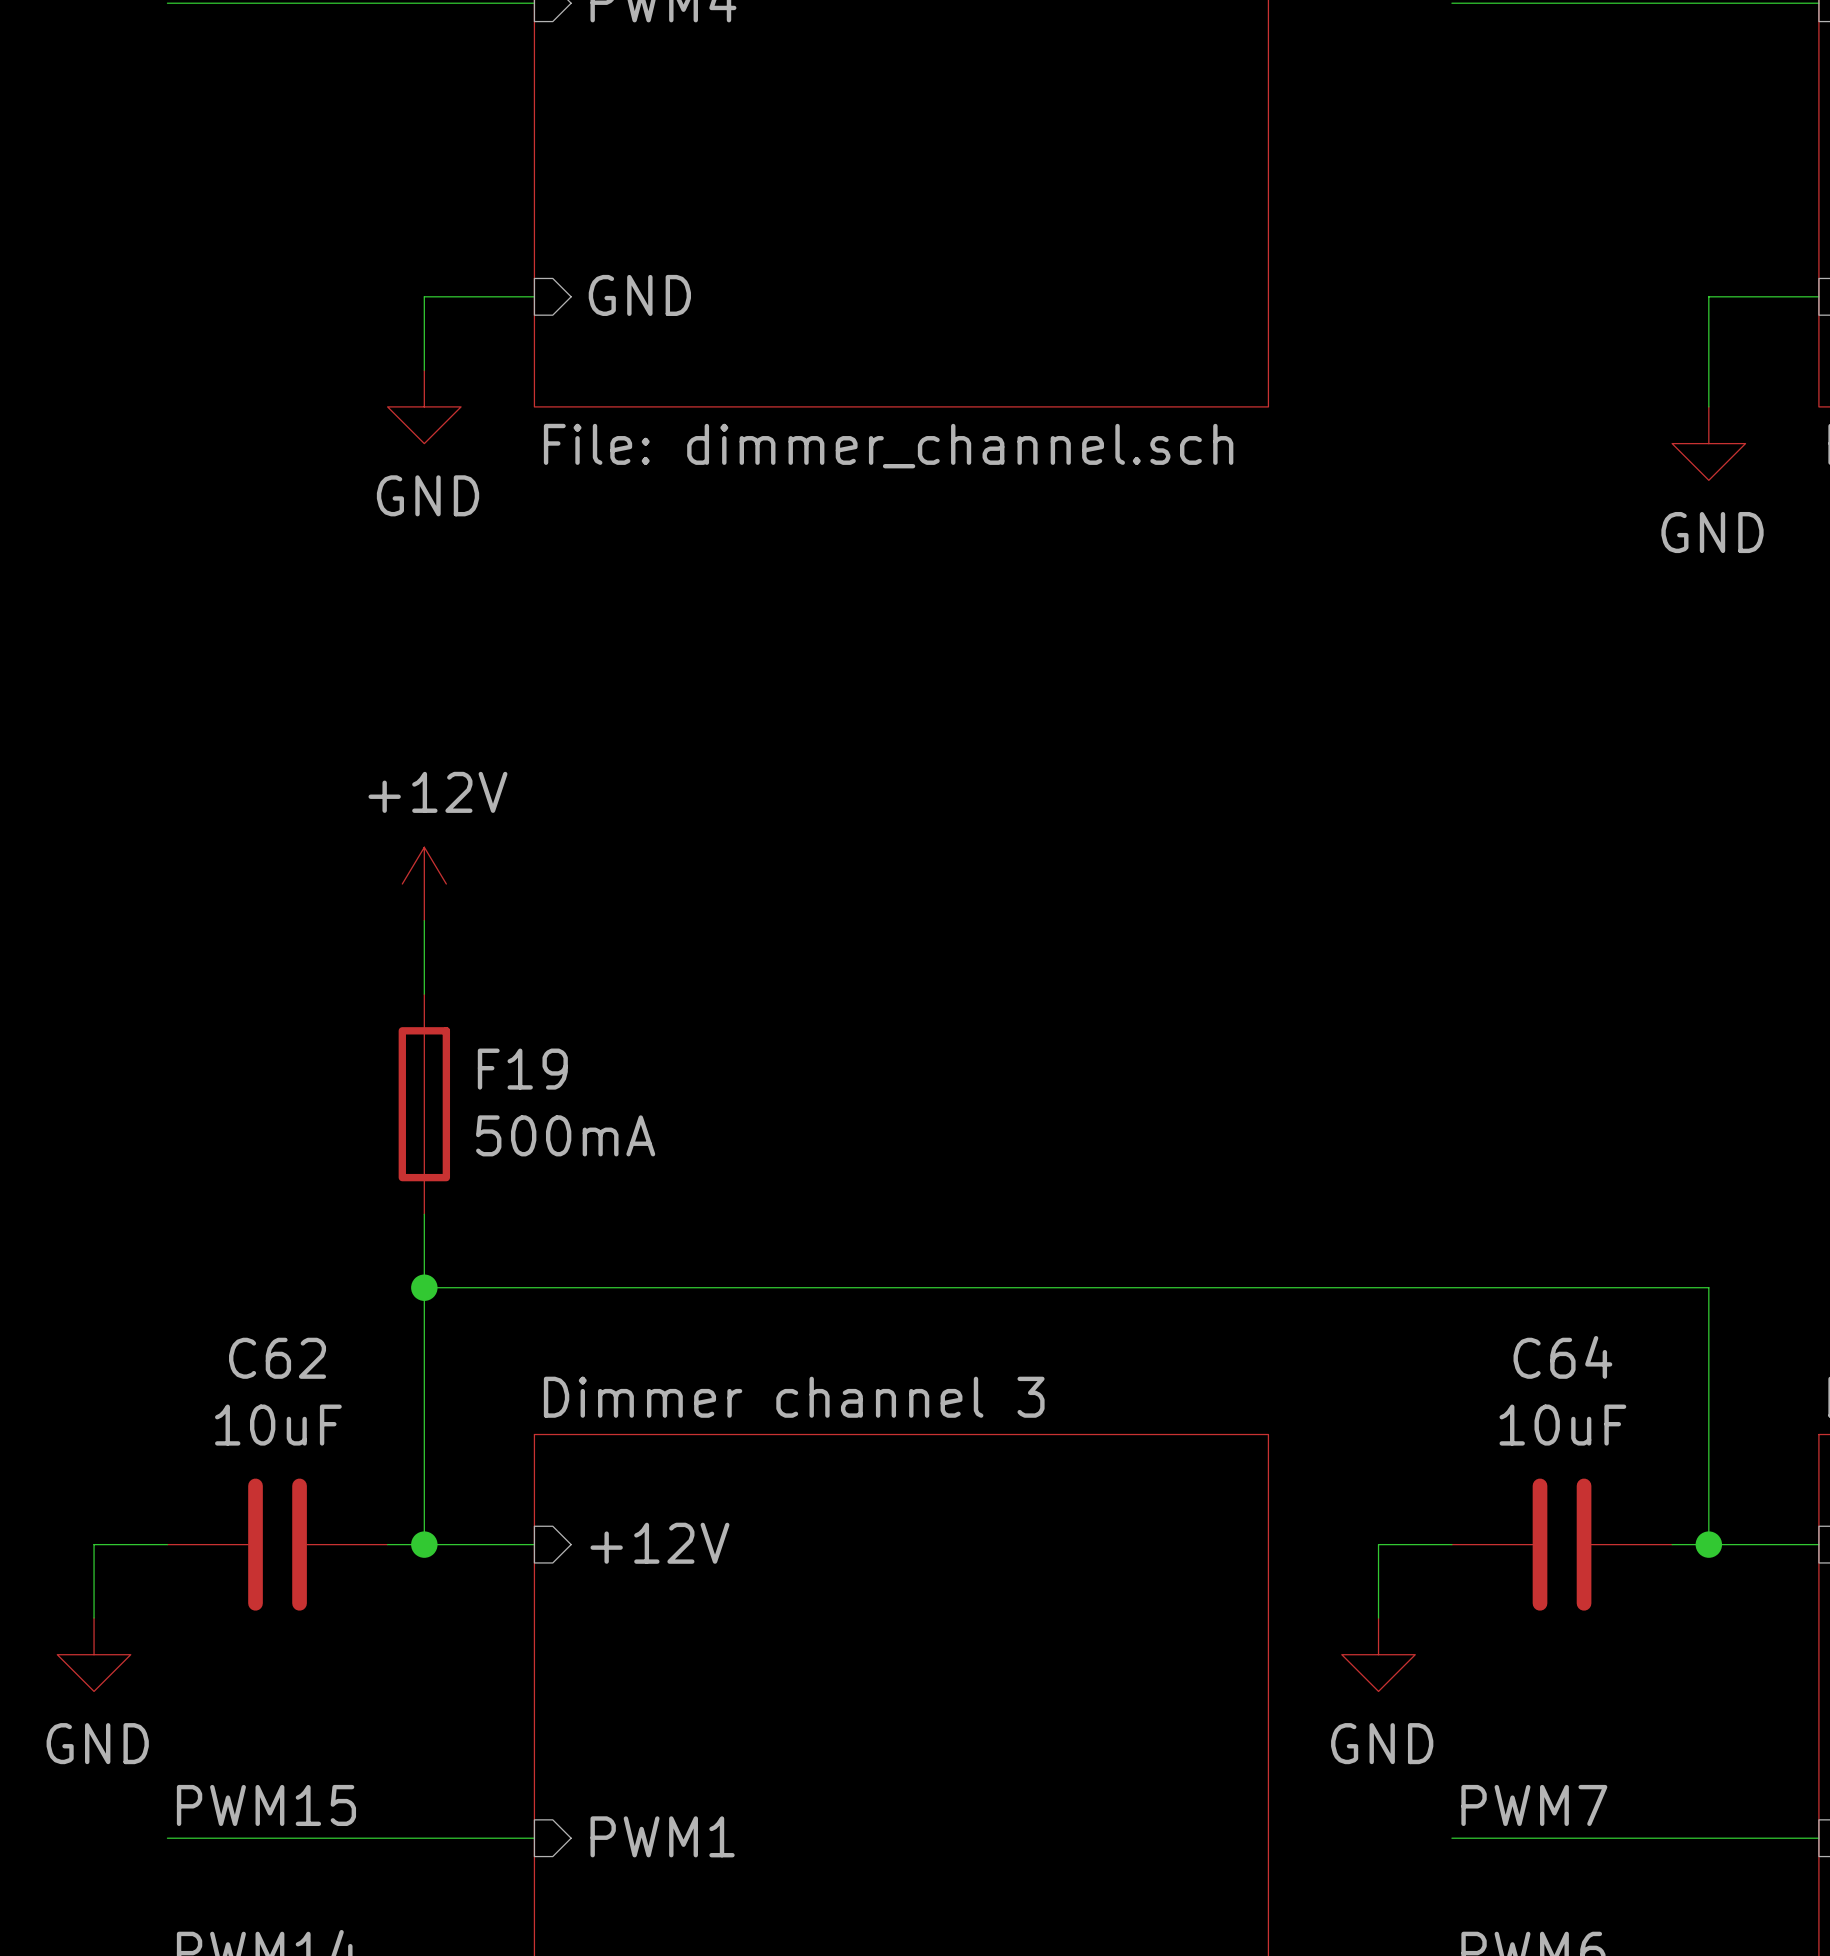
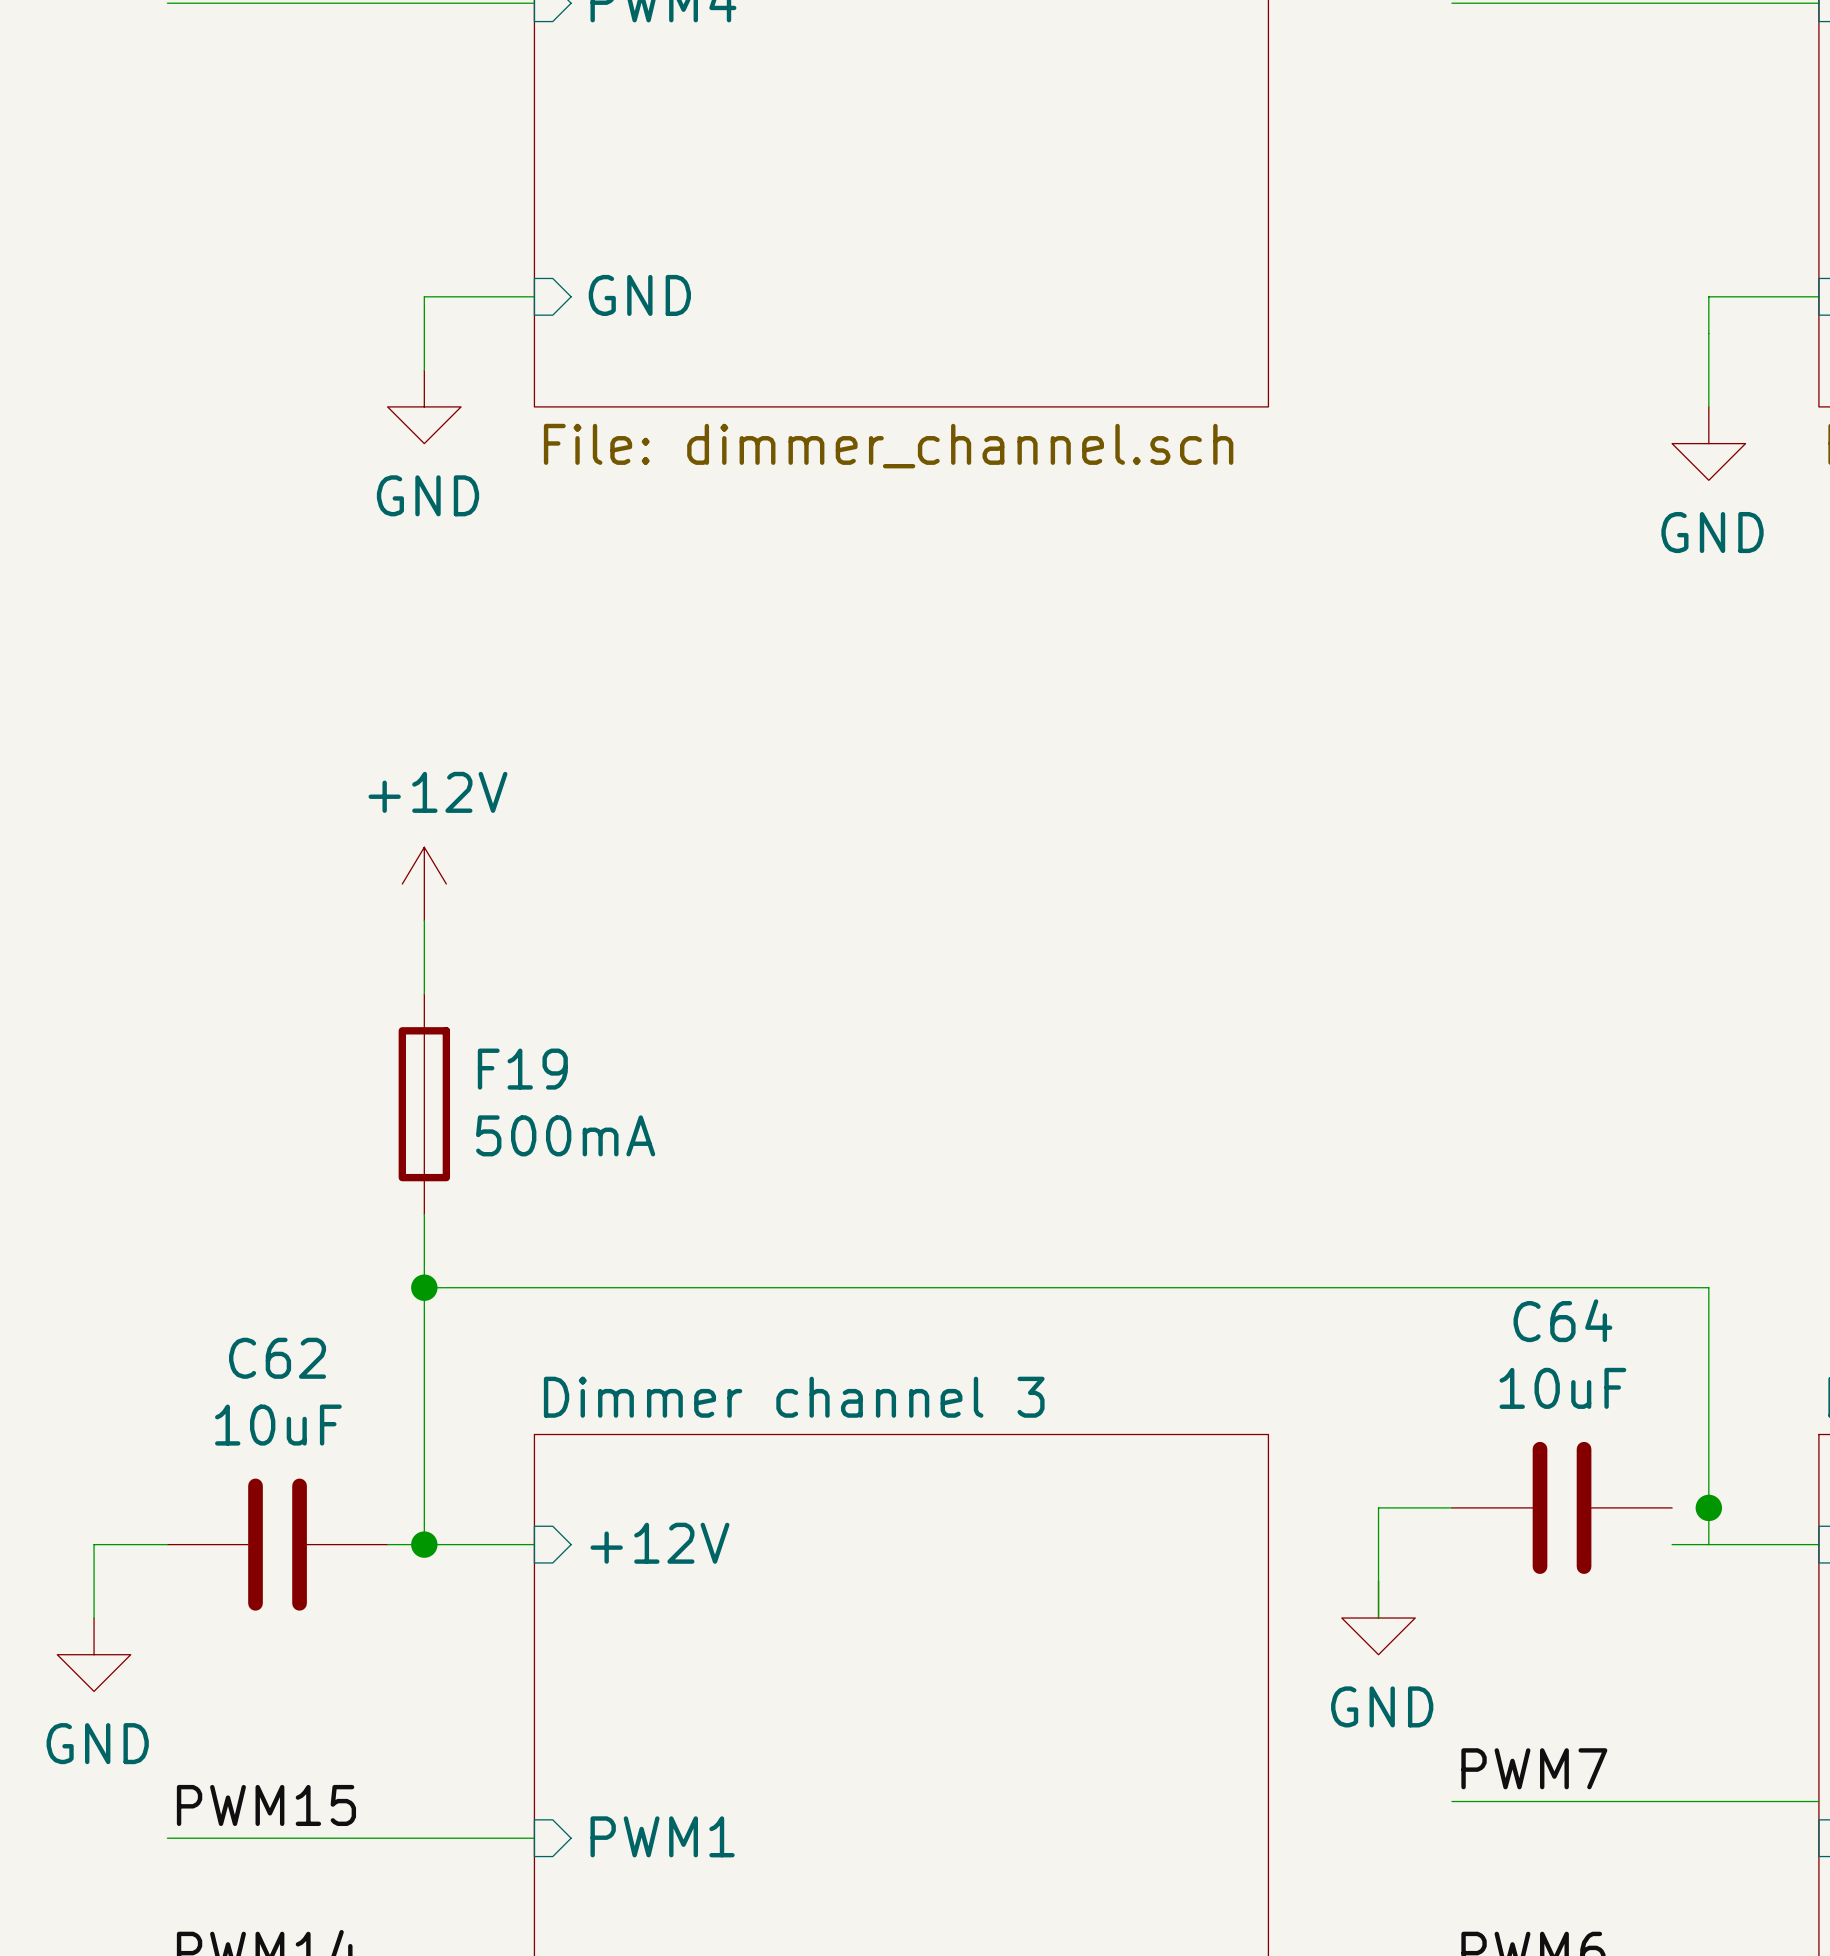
wire: (1378, 1544) (1451, 1544) -> (1378, 1544) (1378, 1507) (1451, 1507)
C64 position: (1562, 1544) -> (1562, 1507)
junction position: (1708, 1544) -> (1708, 1507)
power symbol position: GND (1378, 1654) -> GND (1378, 1618)
label position: PWM7 (1534, 1805) -> PWM7 (1534, 1768)
wire: (1451, 1838) (1818, 1838) -> (1451, 1801) (1818, 1801)

